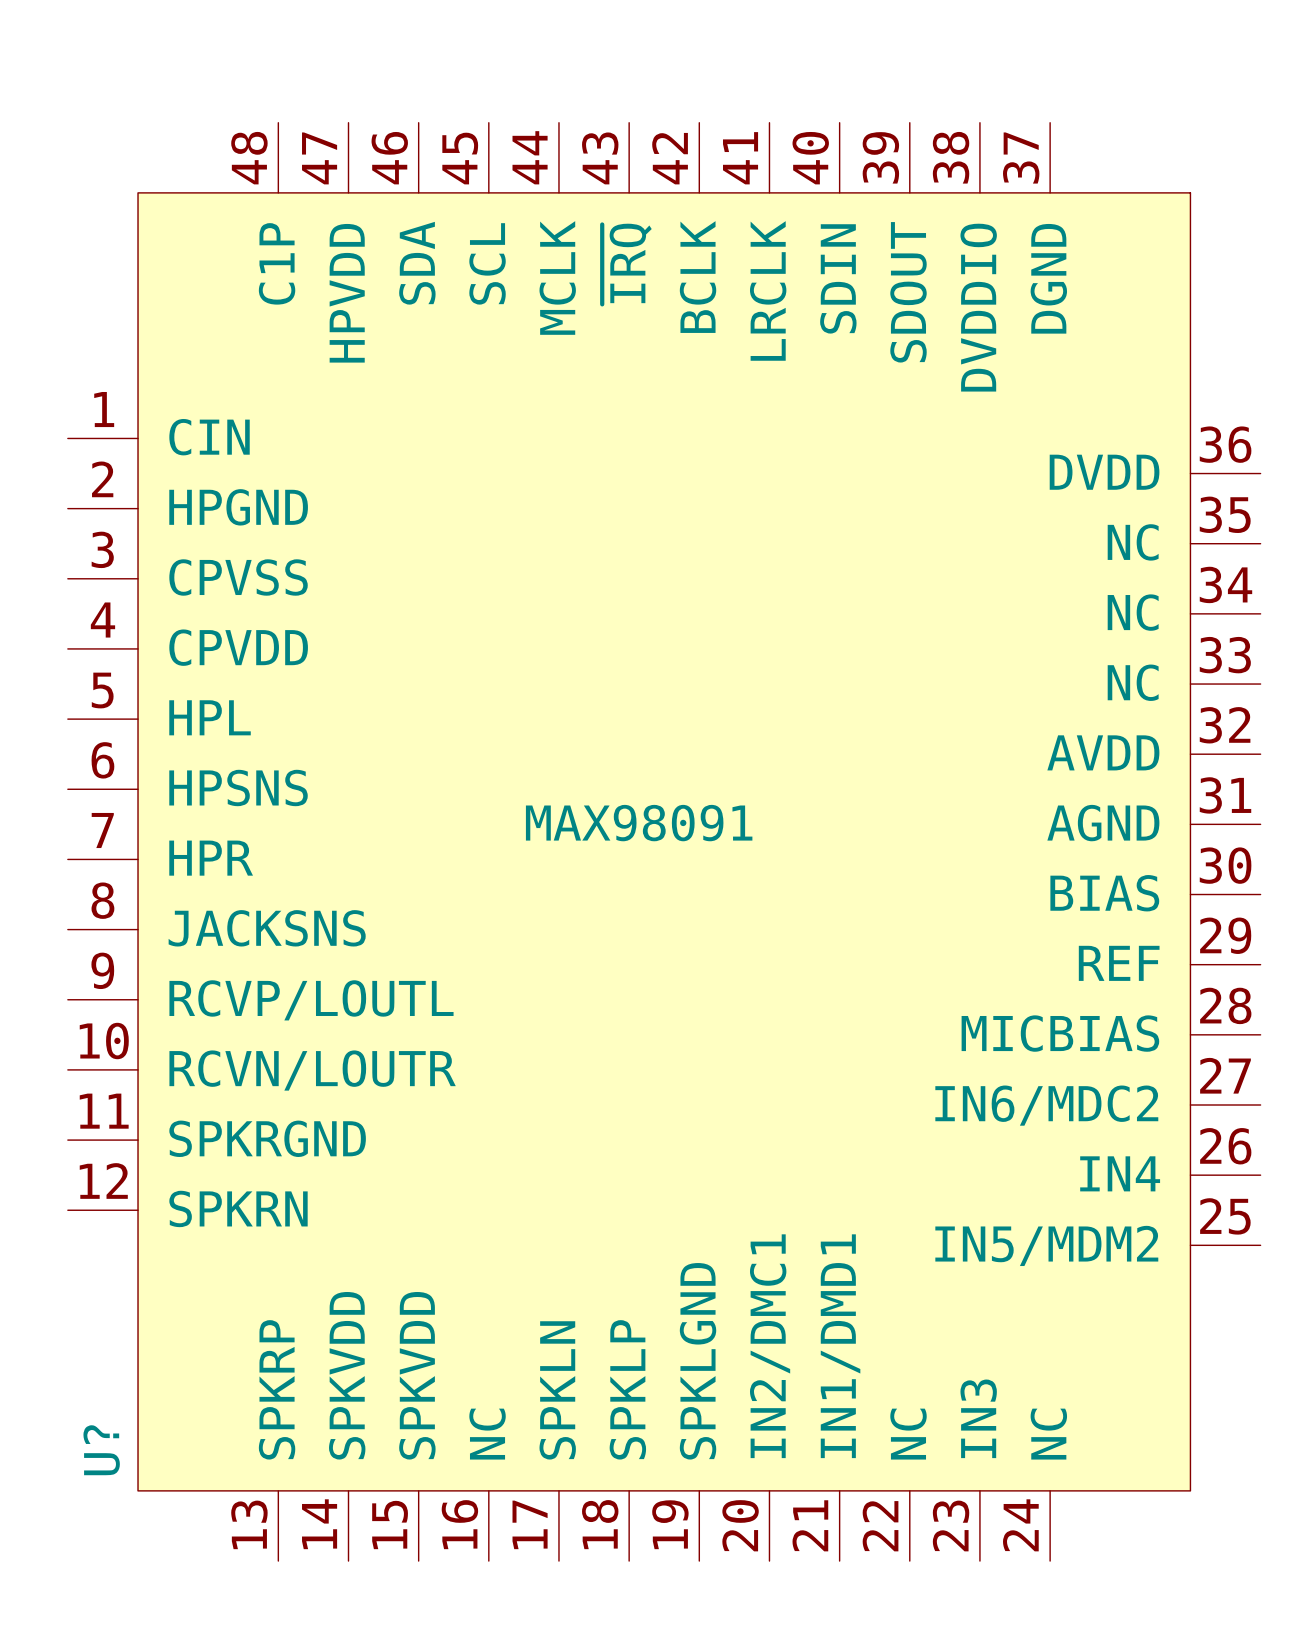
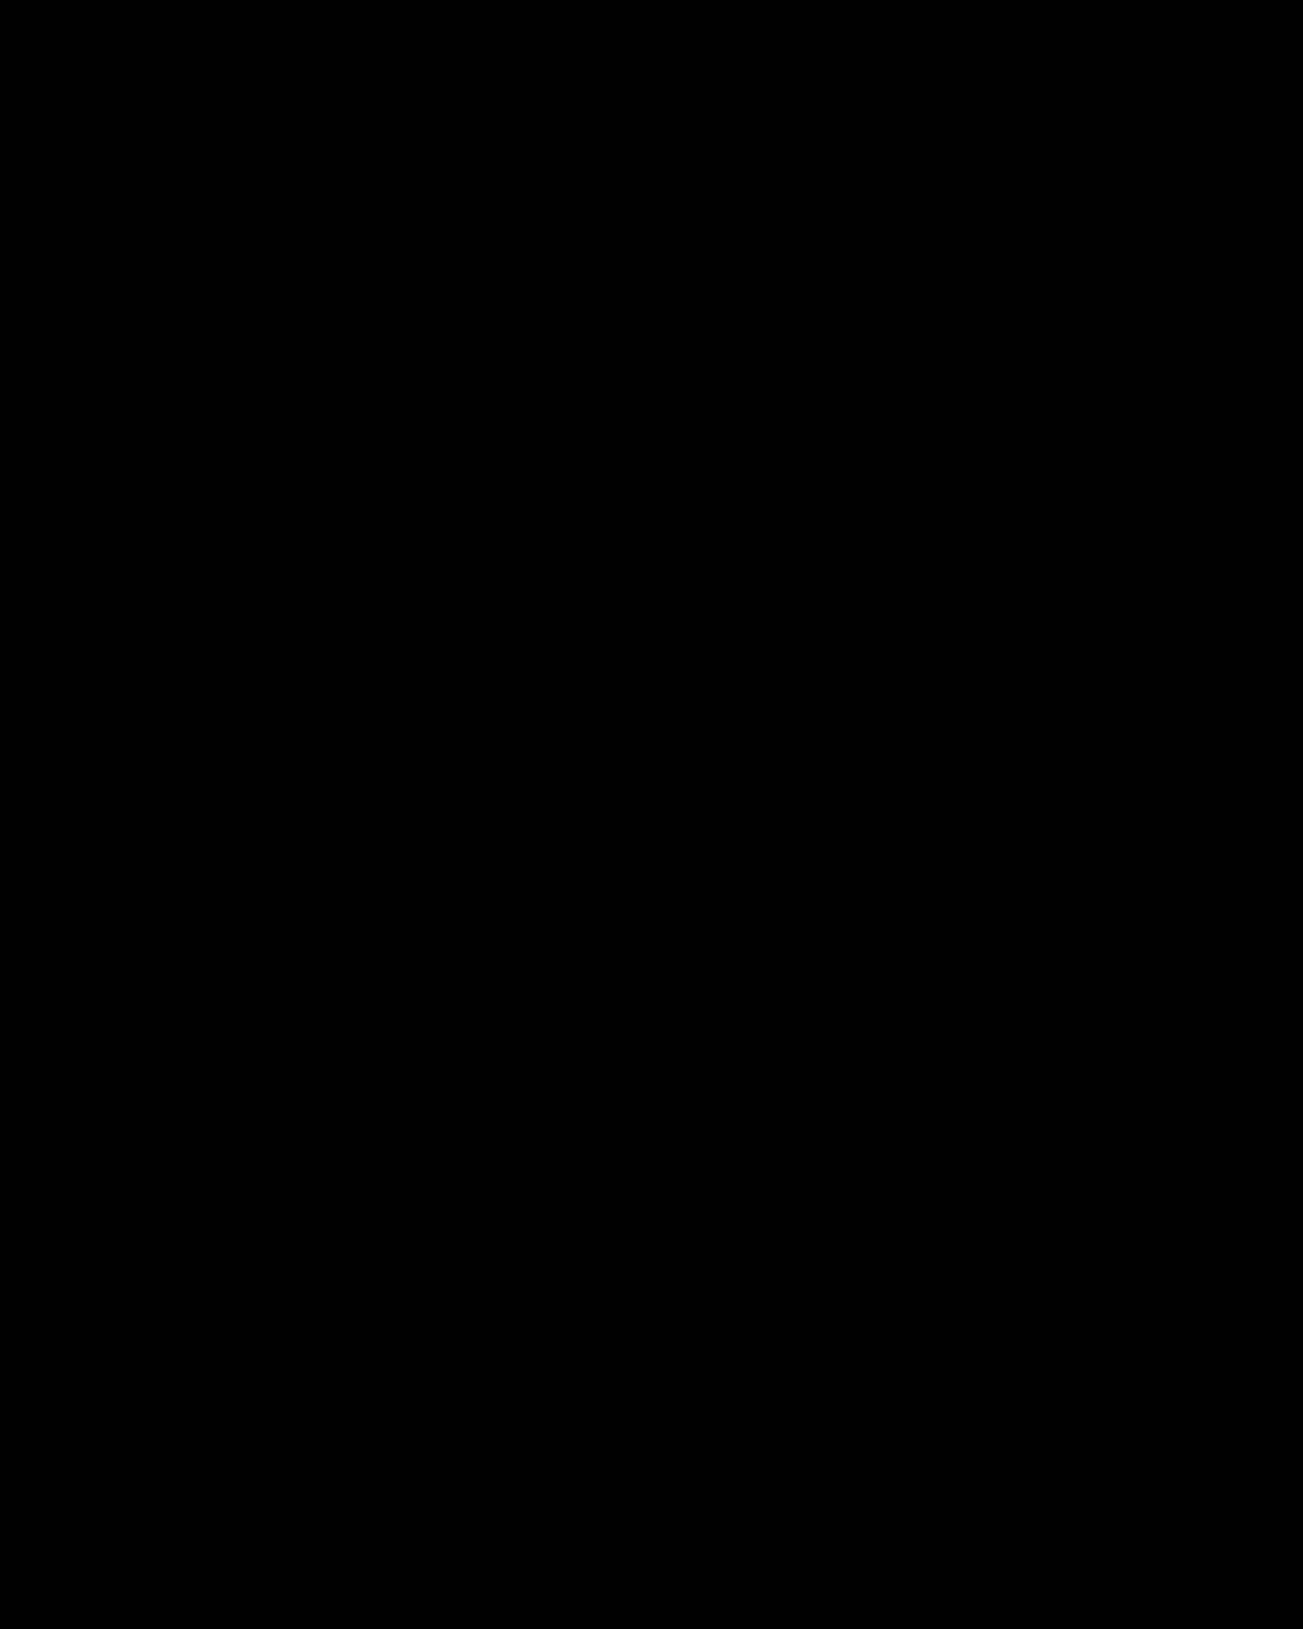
U?: MAX98091 (664, 841) -> none

